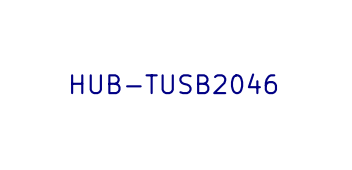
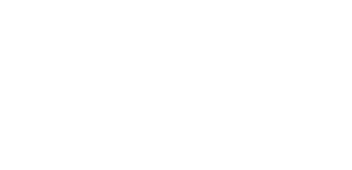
text: HUB-TUSB2046 (174, 83) -> none

